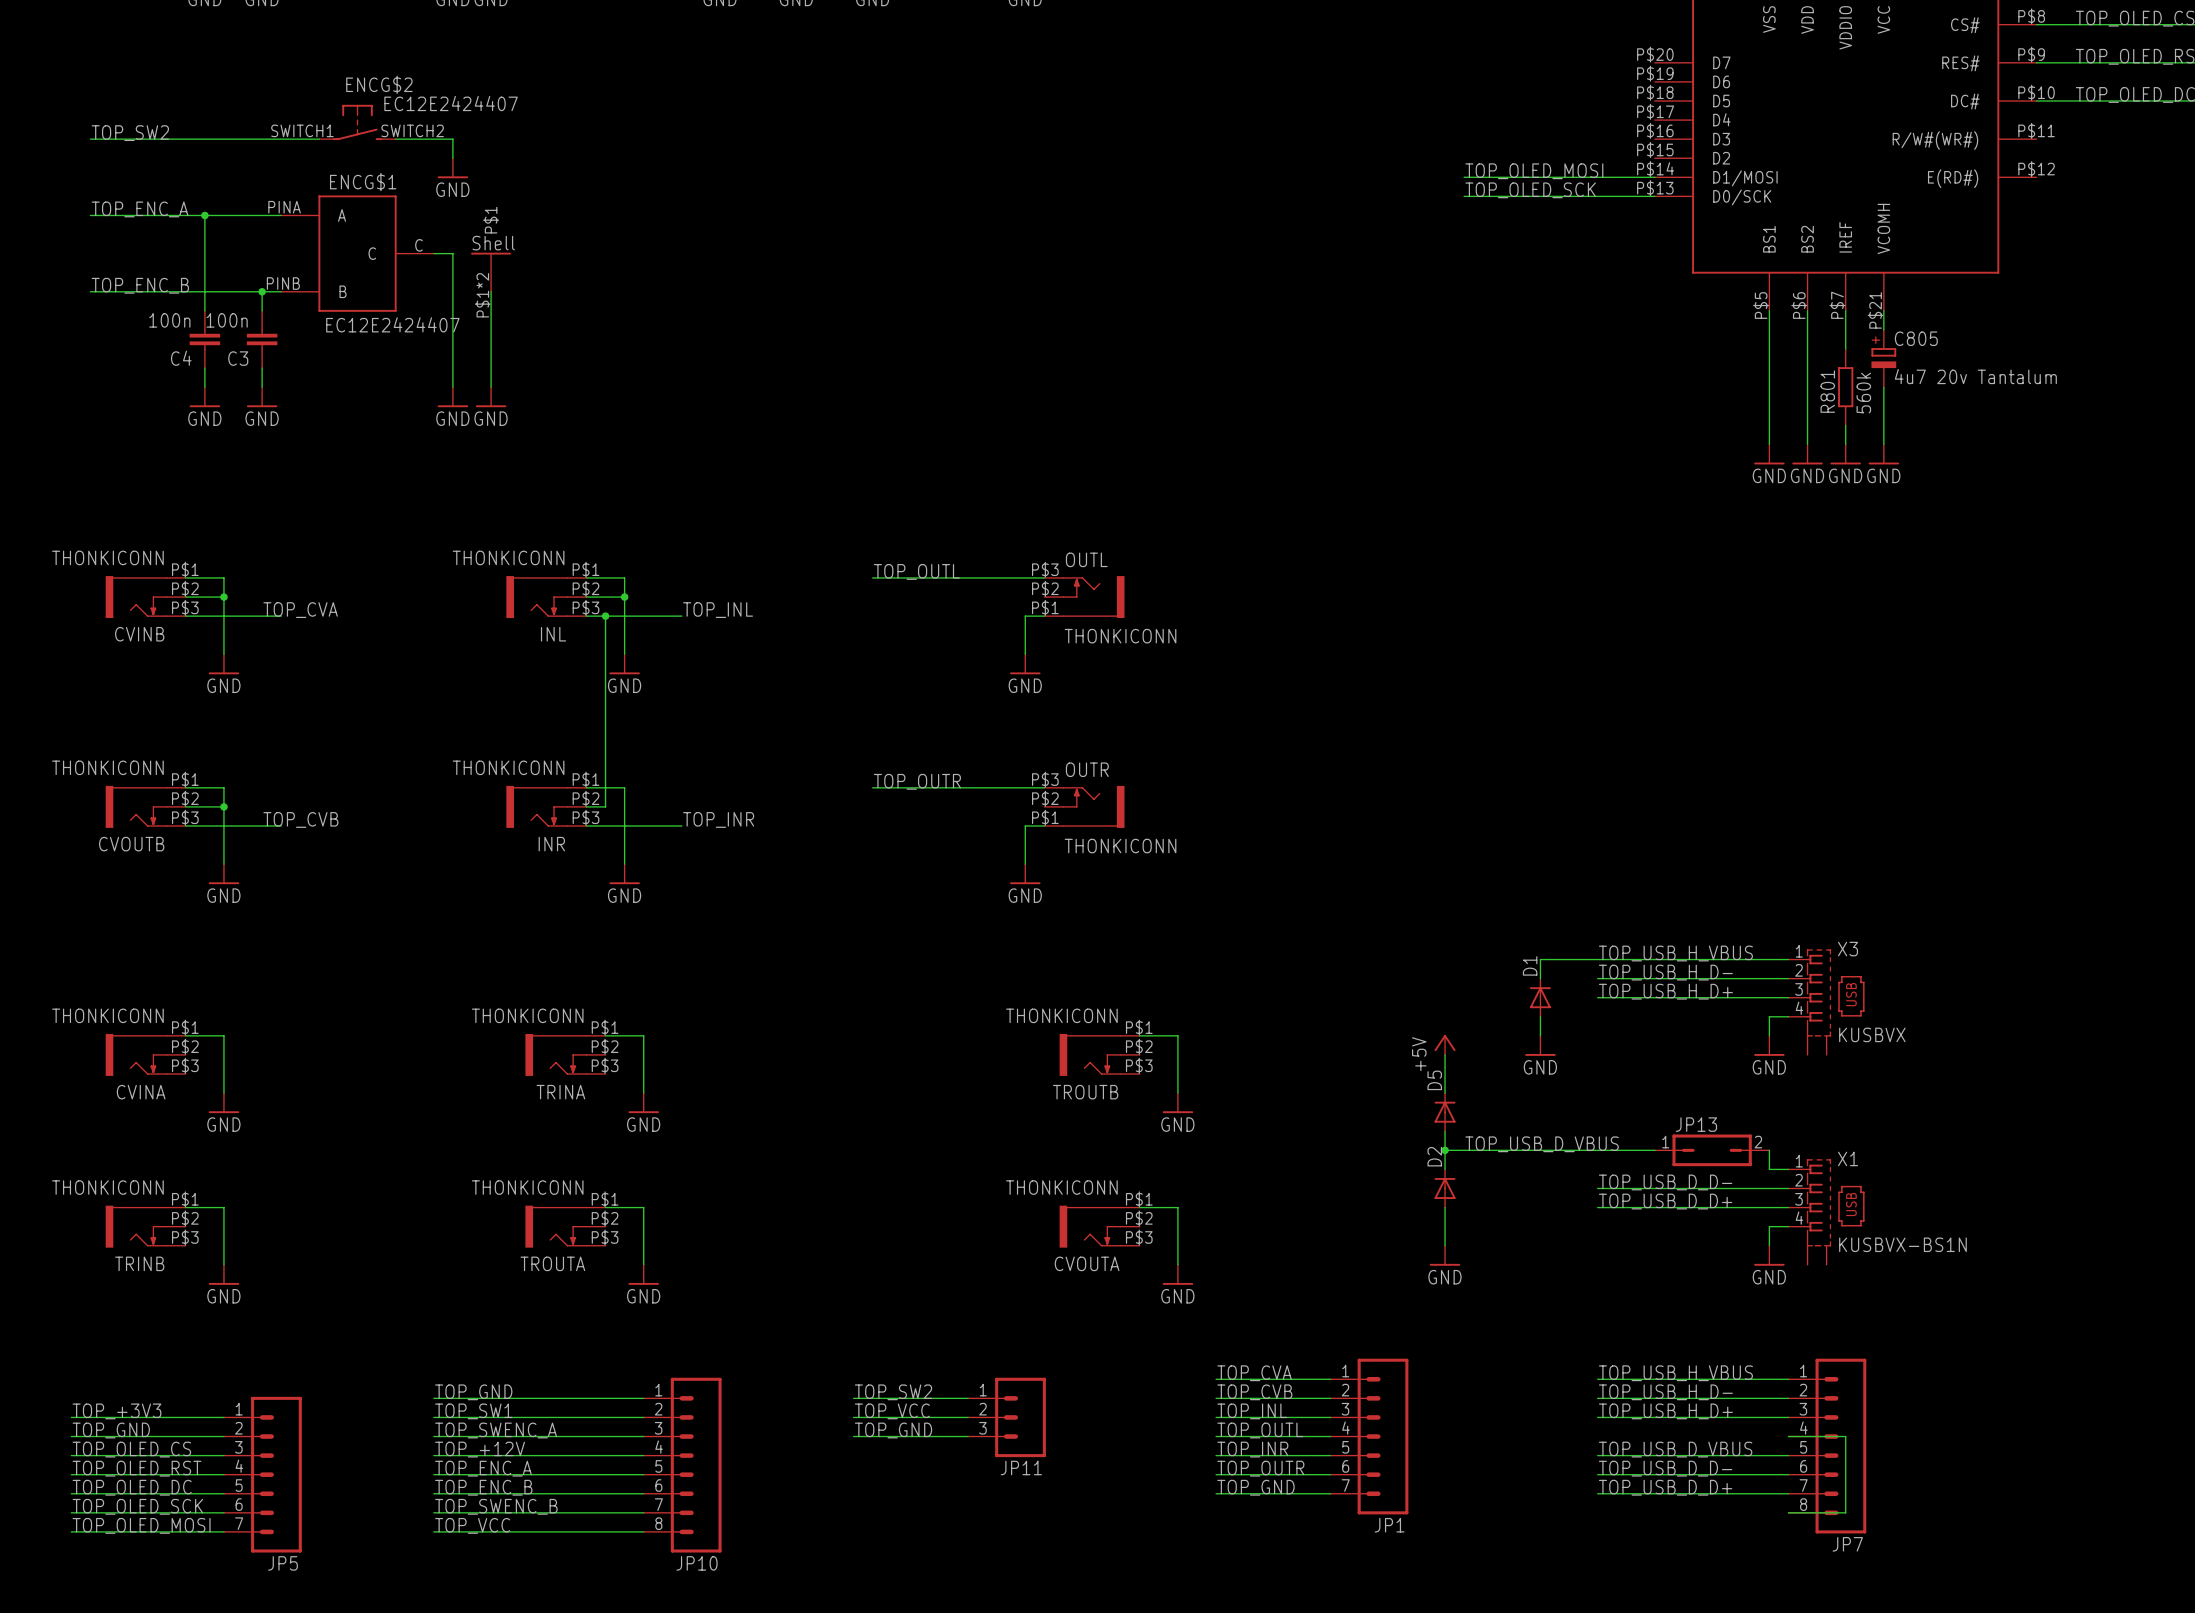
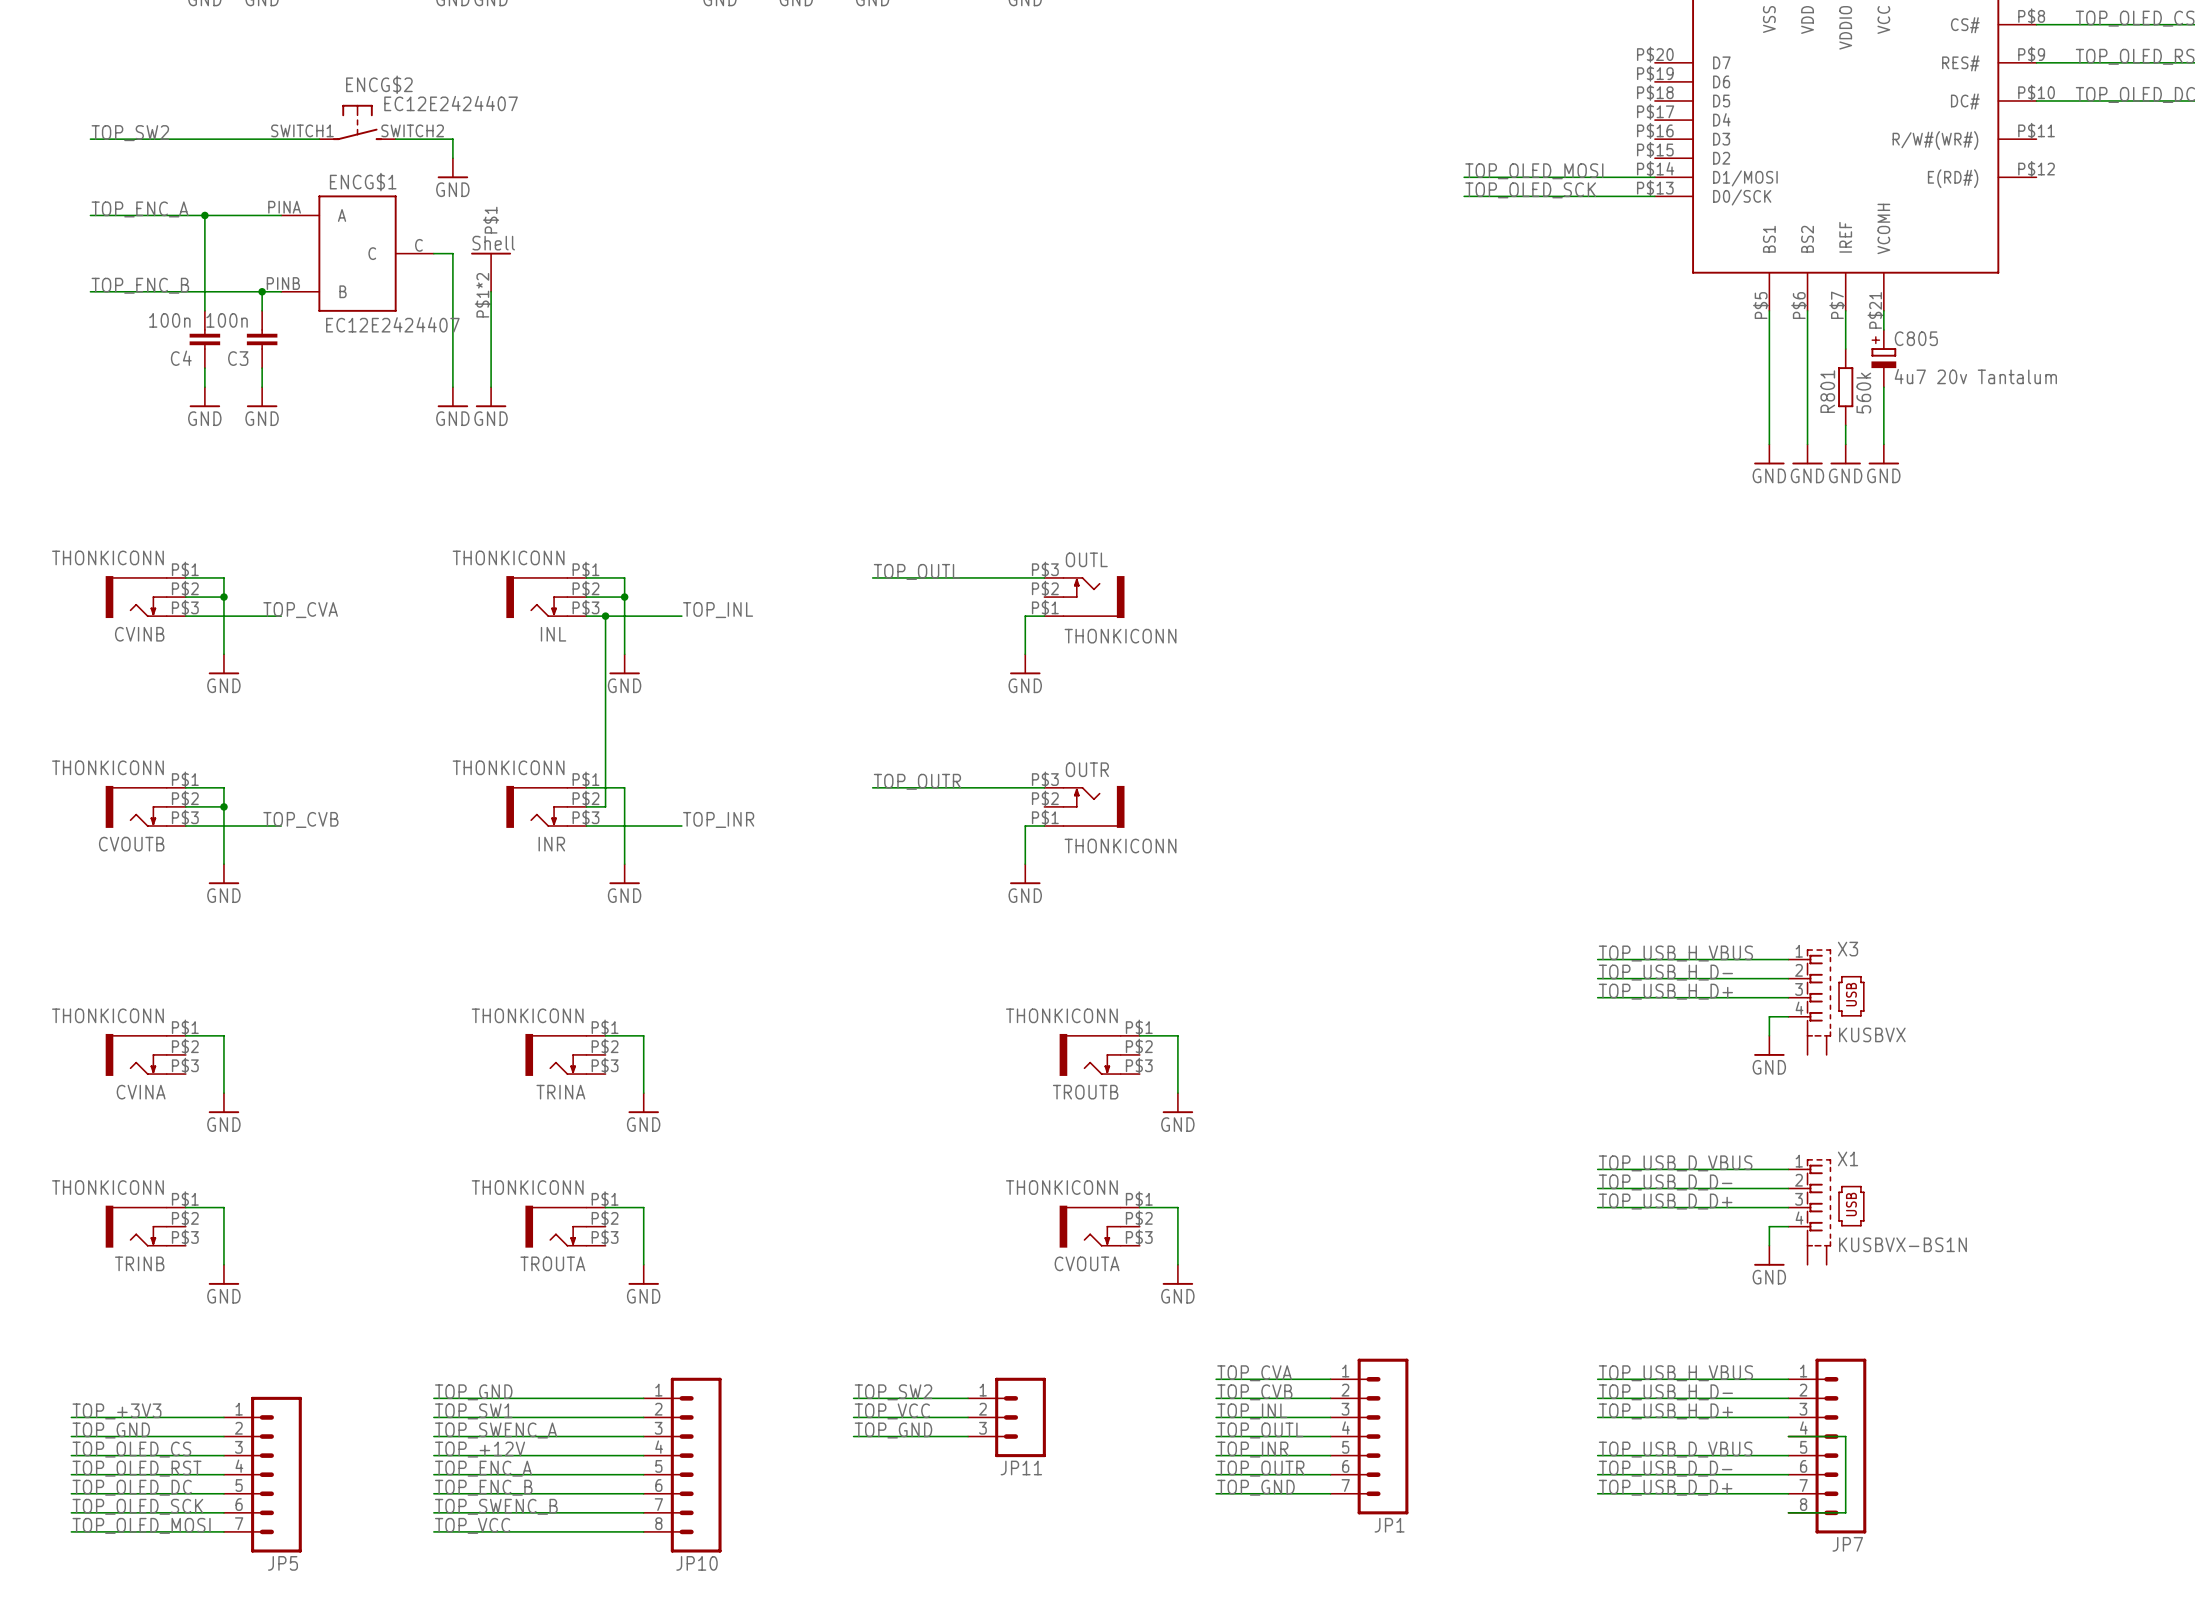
wire: (1597, 959) (1540, 959) (1540, 978) -> none
D1: (1540, 997) -> none
wire: (1540, 1016) (1540, 1035) -> none
power symbol: +5V (1445, 1044) -> none
power symbol: GND (1540, 1045) -> none
wire: (1445, 1054) (1445, 1093) -> none
D5: (1445, 1112) -> none
wire: (1445, 1131) (1445, 1169) -> none
label position: TOP_USB_D_VBUS (1542, 1144) -> TOP_USB_D_VBUS (1675, 1163)
wire: (1445, 1150) (1654, 1150) -> none
junction: (1445, 1150) -> none
JP13: (1712, 1150) -> none
wire: (1769, 1150) (1769, 1169) -> (1597, 1169) (1769, 1169)
D2: (1445, 1188) -> none
wire: (1445, 1207) (1445, 1245) -> none
power symbol: GND (1445, 1255) -> none

